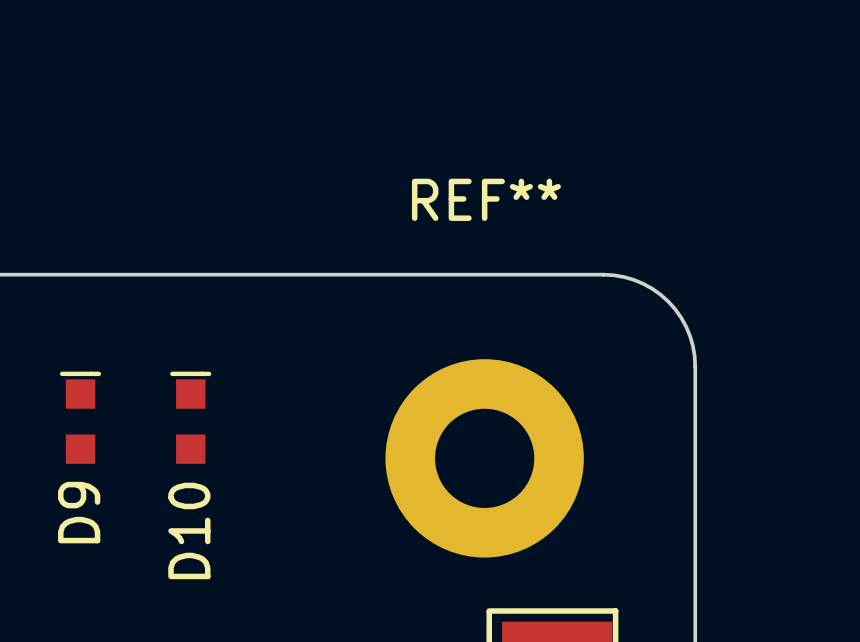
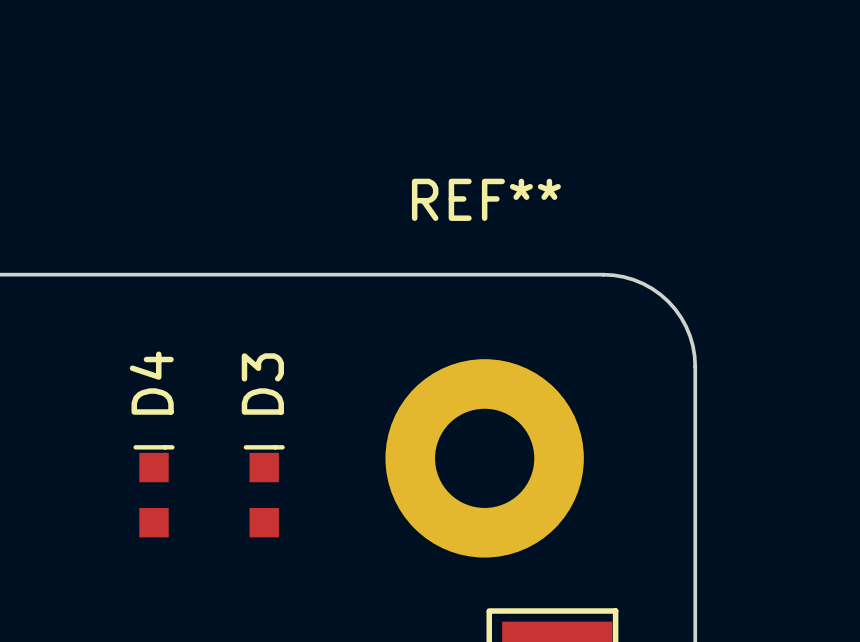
D9: (80, 417) -> none
D10: (190, 417) -> none
D4: none -> (154, 491)
D3: none -> (264, 491)

